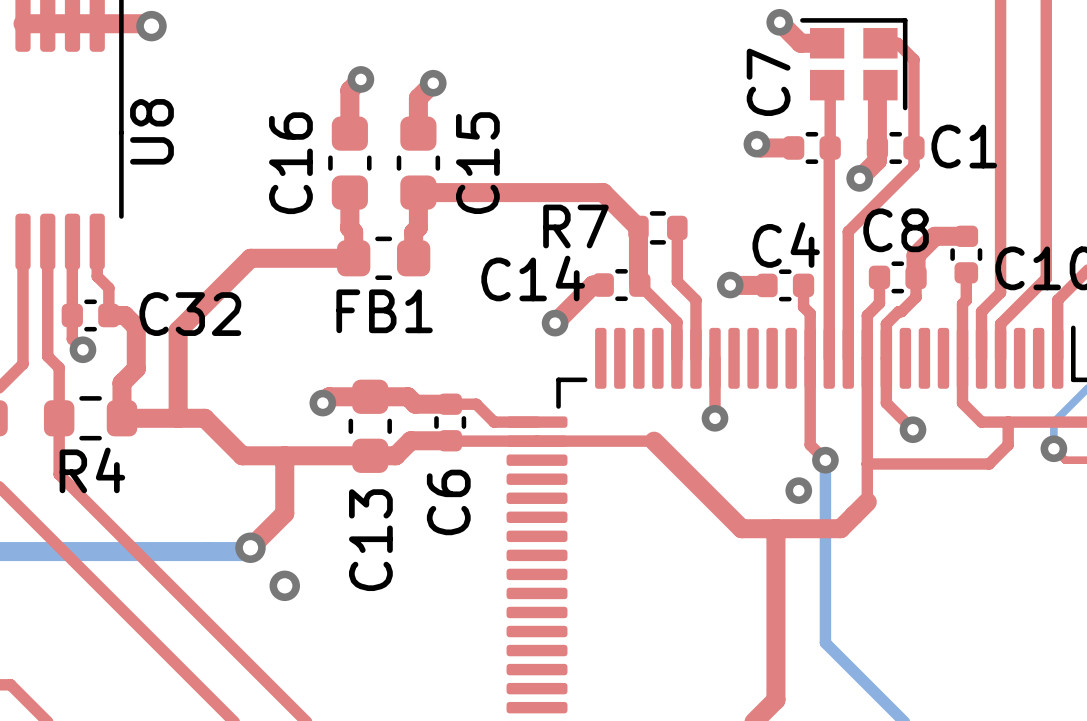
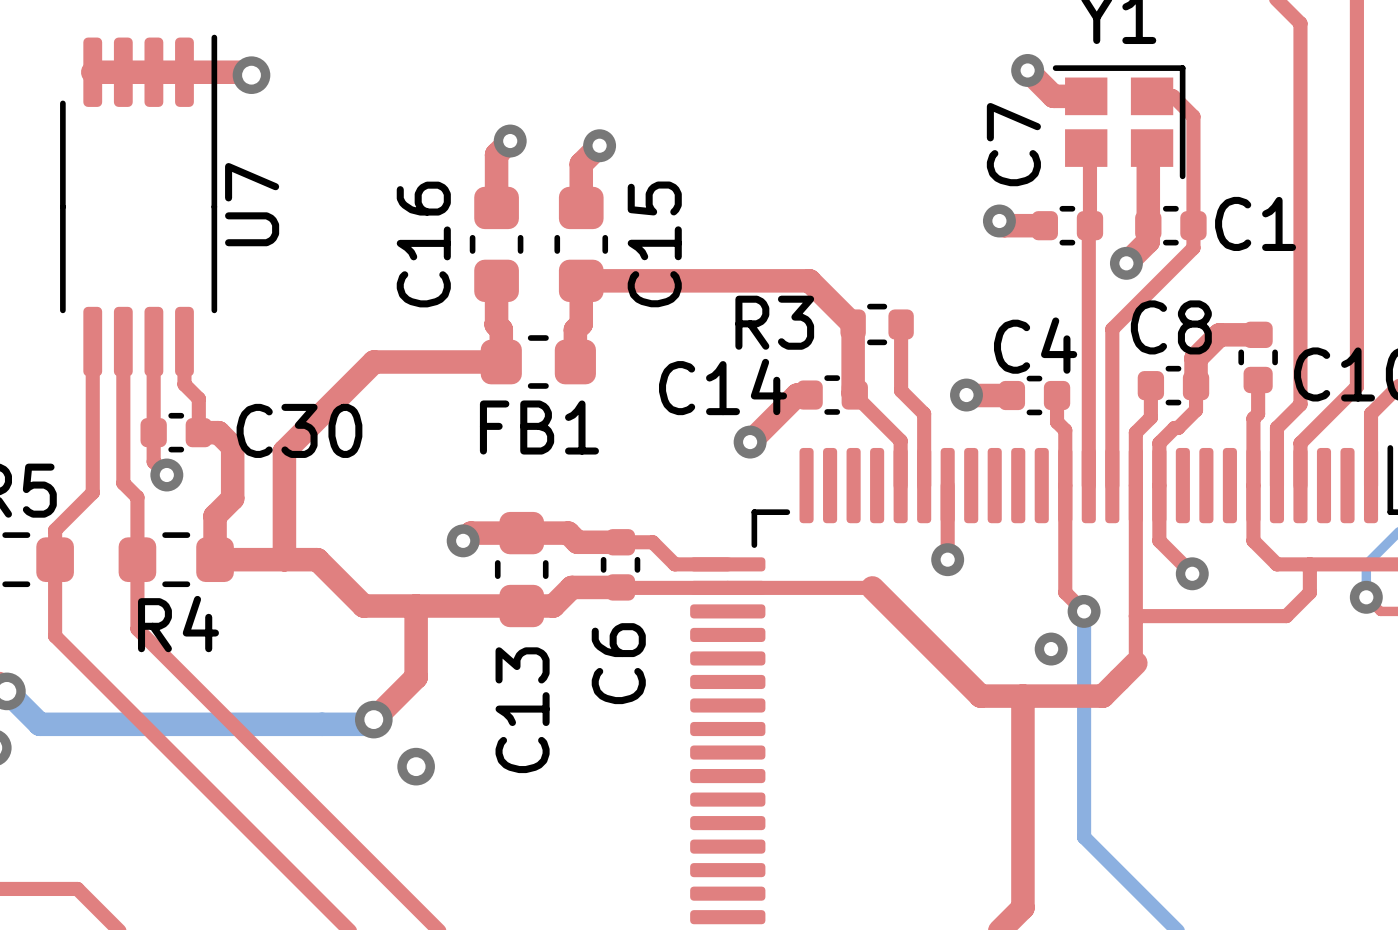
U8 name: U8 (151, 131) -> U7 (252, 204)
R7 name: R7 (575, 226) -> R3 (774, 322)
C32 name: C32 (190, 314) -> C30 (299, 430)

